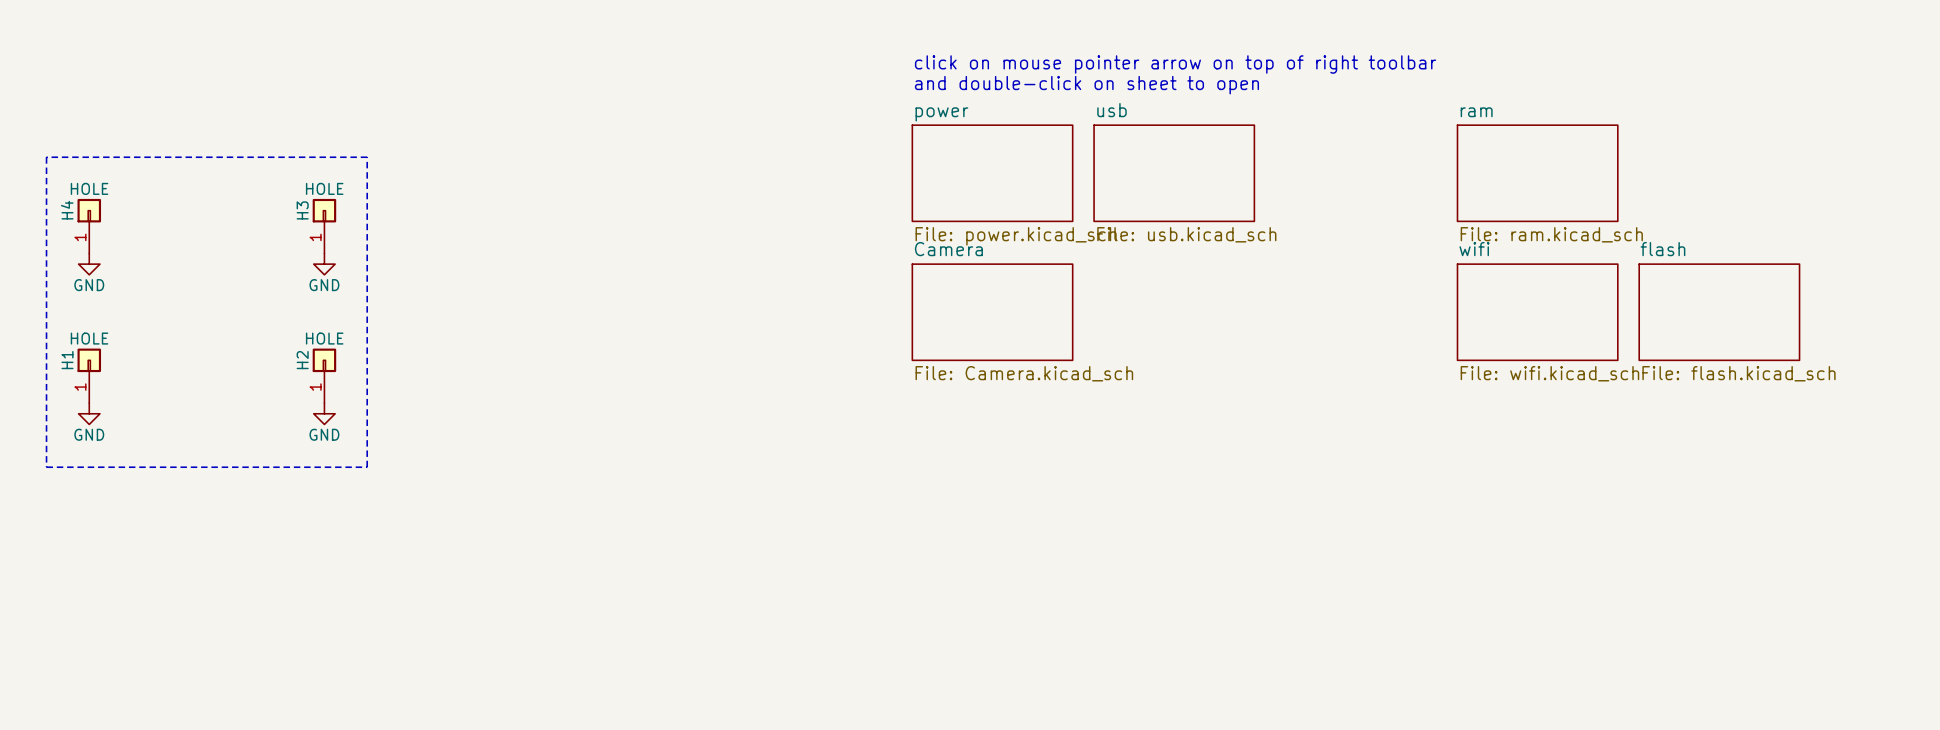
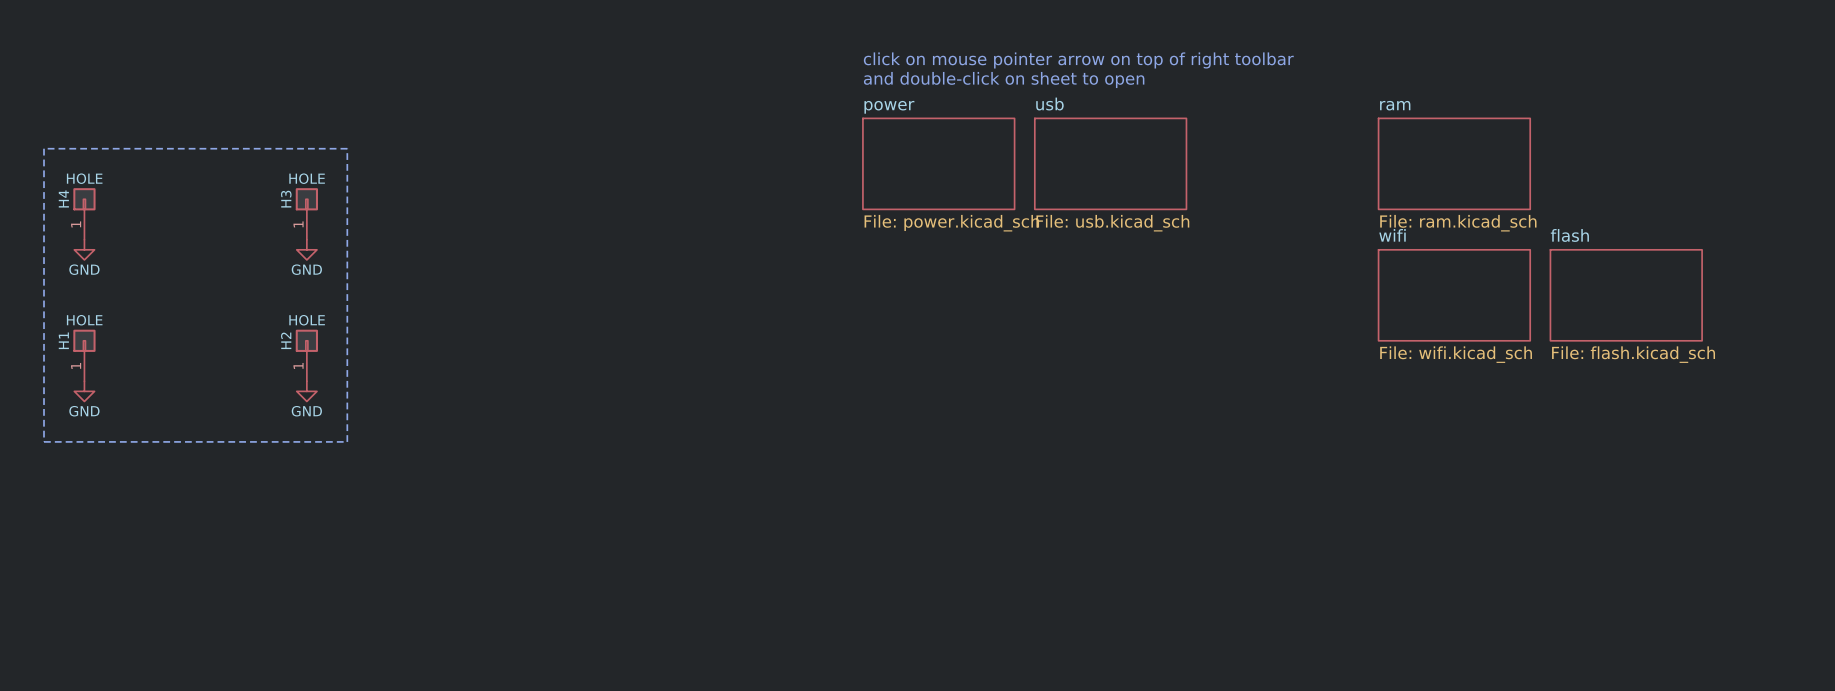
sheet Camera: File: Camera.kicad_sch (992, 312) -> none

